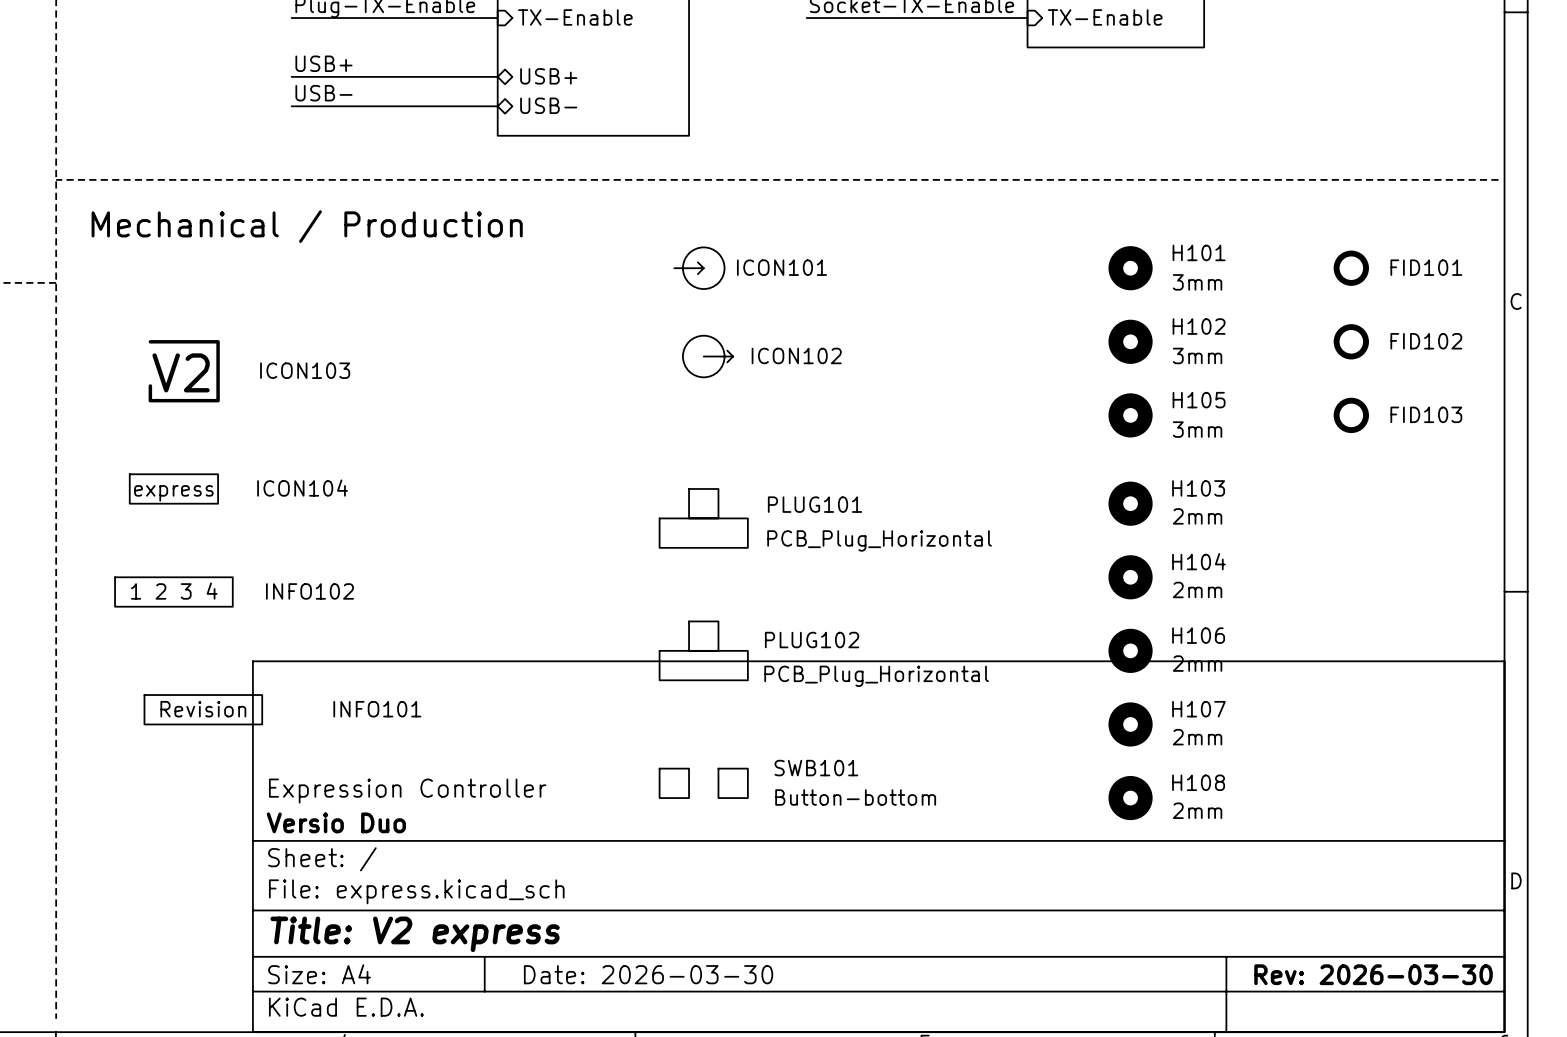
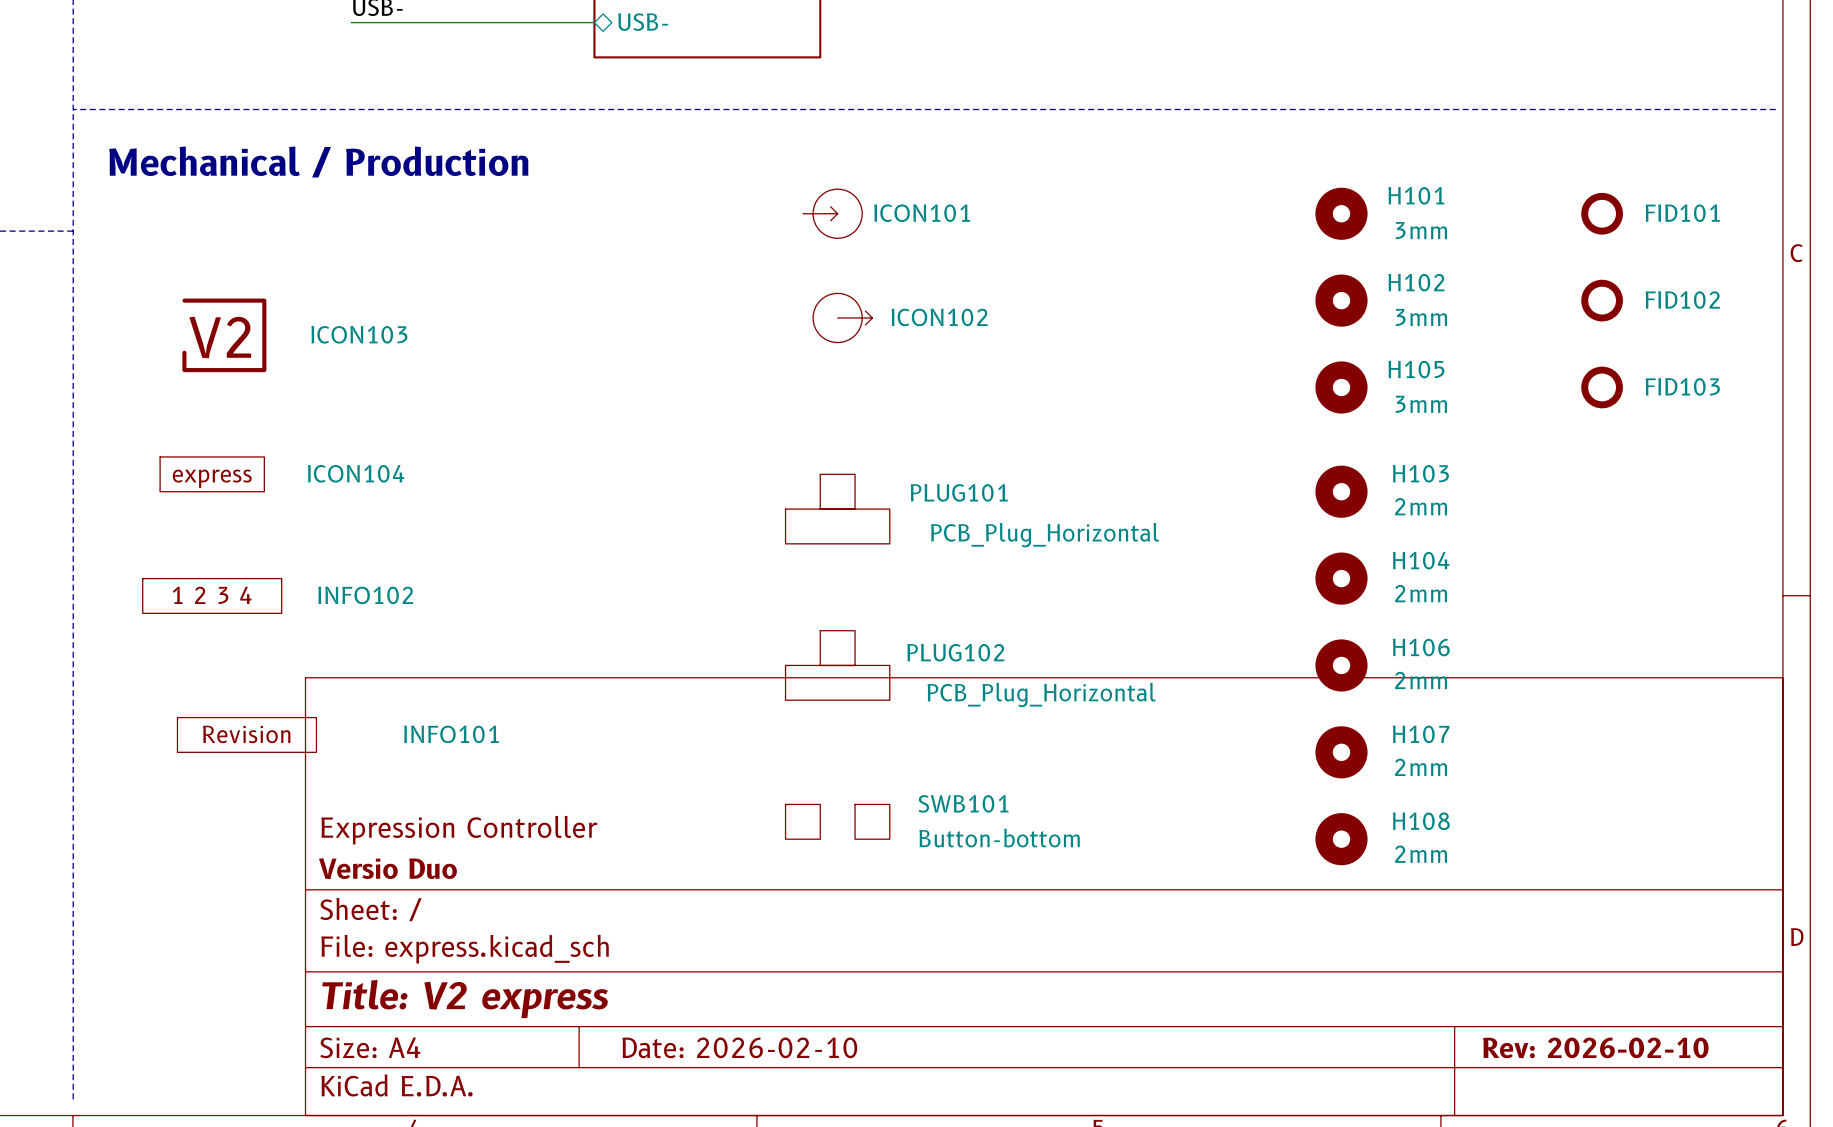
title block: Date: 2026-03-30 (648, 974) -> Date: 2026-02-10 (739, 1047)
title block: Rev: 2026-03-30 (1373, 974) -> Rev: 2026-02-10 (1595, 1047)

